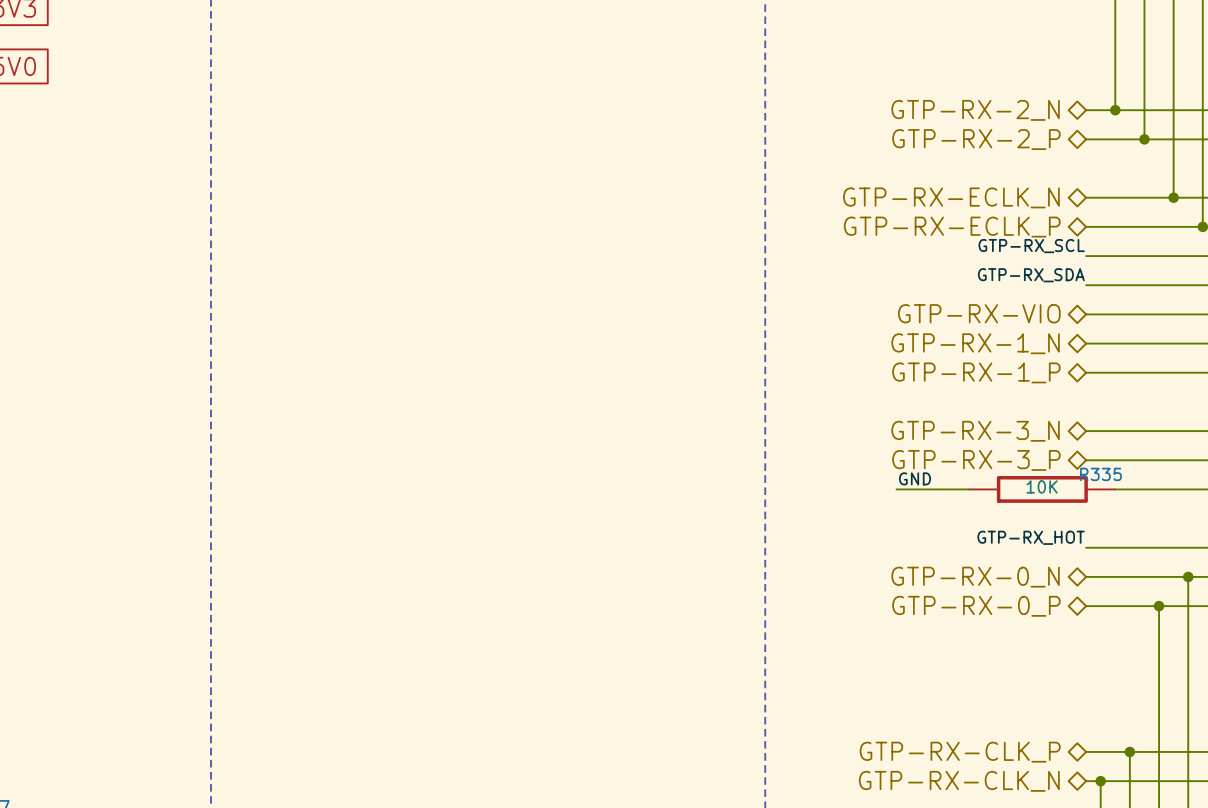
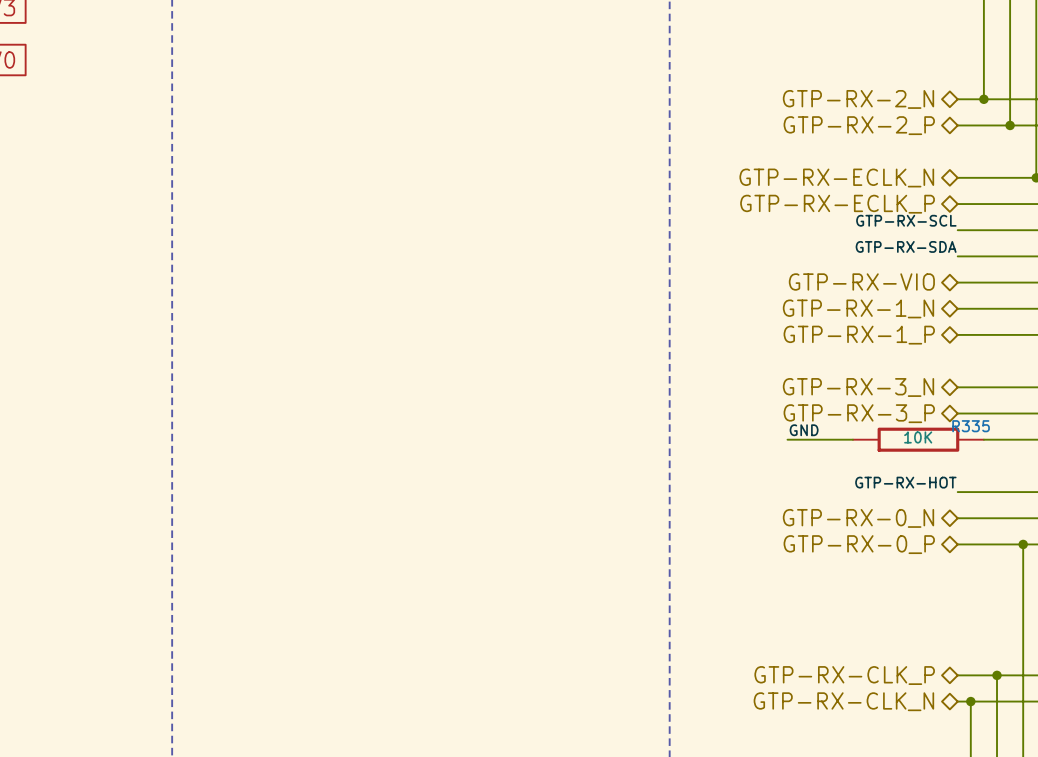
label: GTP-RX_SCL (1031, 246) -> GTP-RX-SCL (906, 220)
label: GTP-RX_SDA (1031, 275) -> GTP-RX-SDA (906, 246)
label: GTP-RX_HOT (1031, 537) -> GTP-RX-HOT (905, 482)

